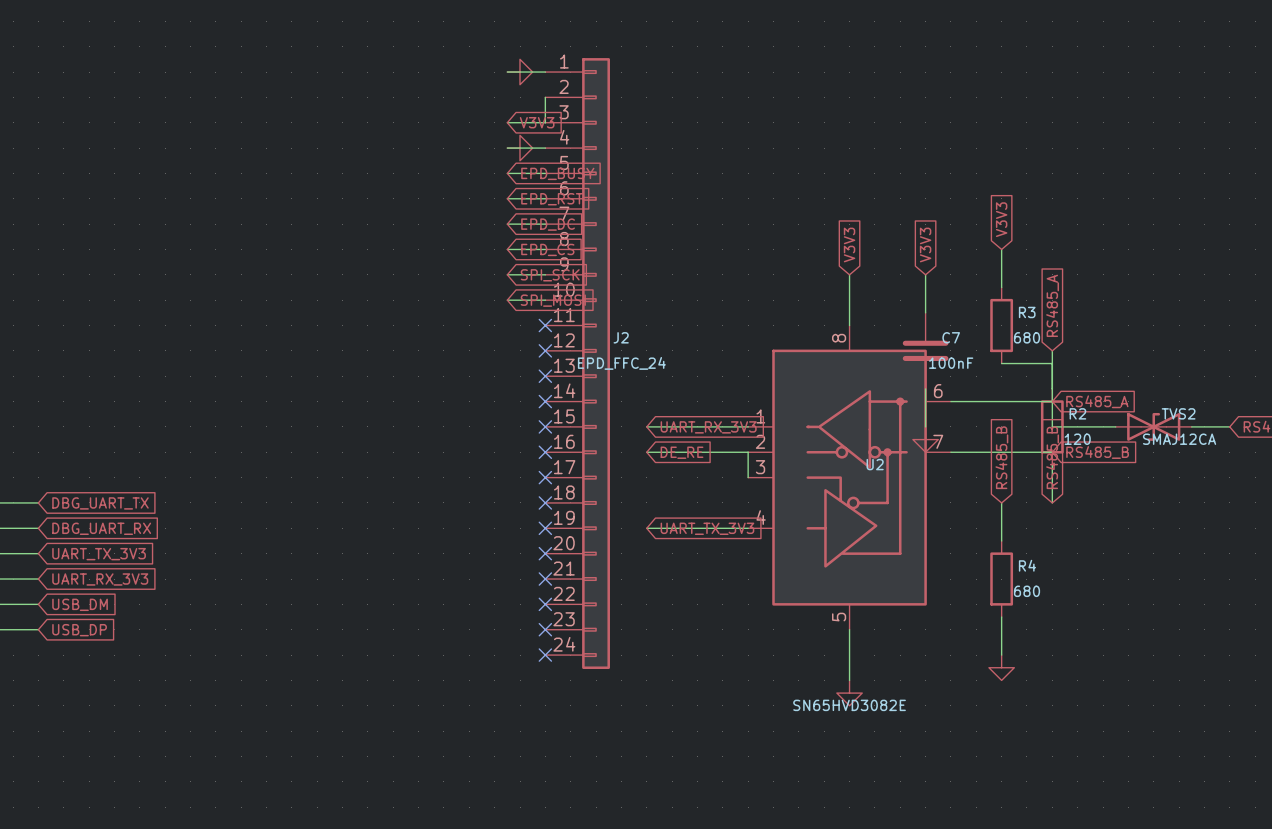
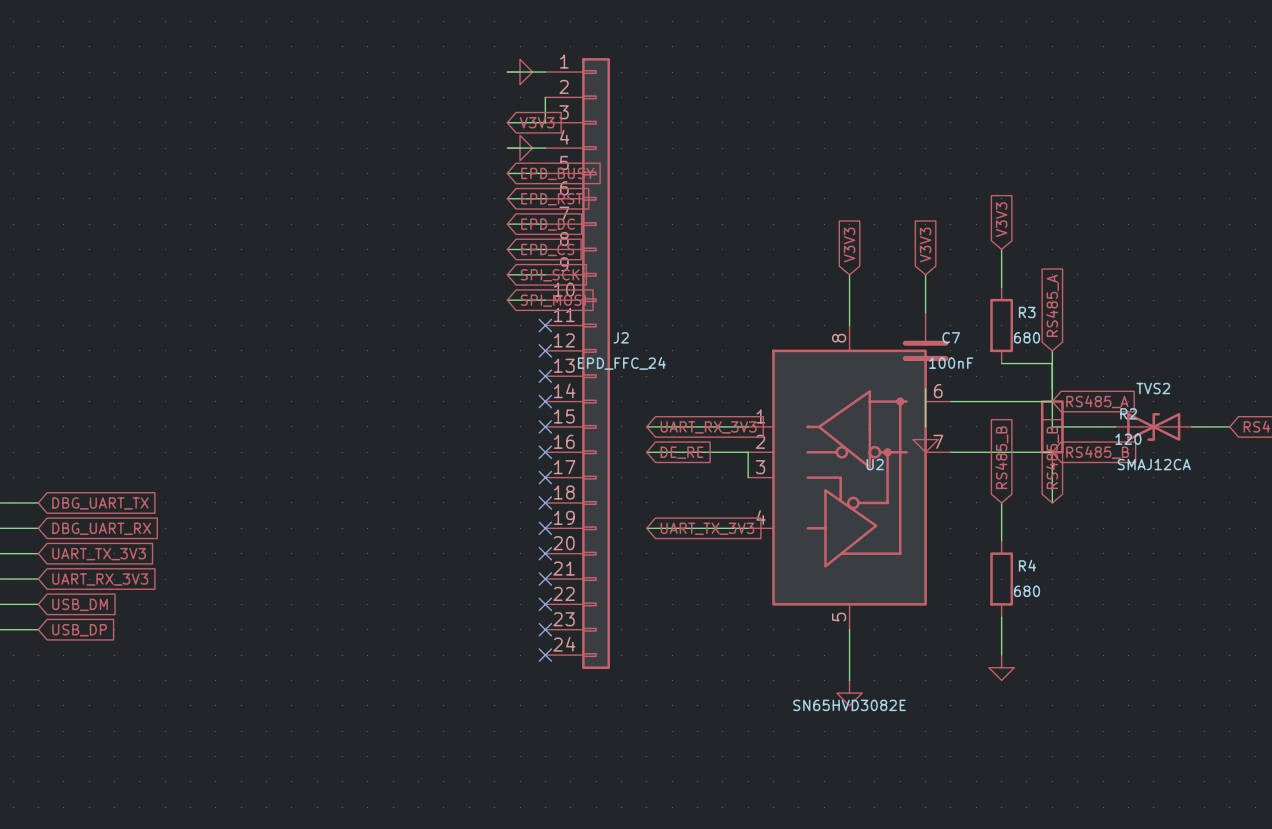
R2 name position: R2 (1077, 413) -> R2 (1128, 413)
TVS2 name position: TVS2 (1178, 413) -> TVS2 (1153, 388)
R2 value position: 120 (1077, 439) -> 120 (1128, 439)
TVS2 value position: SMAJ12CA (1179, 439) -> SMAJ12CA (1154, 464)

